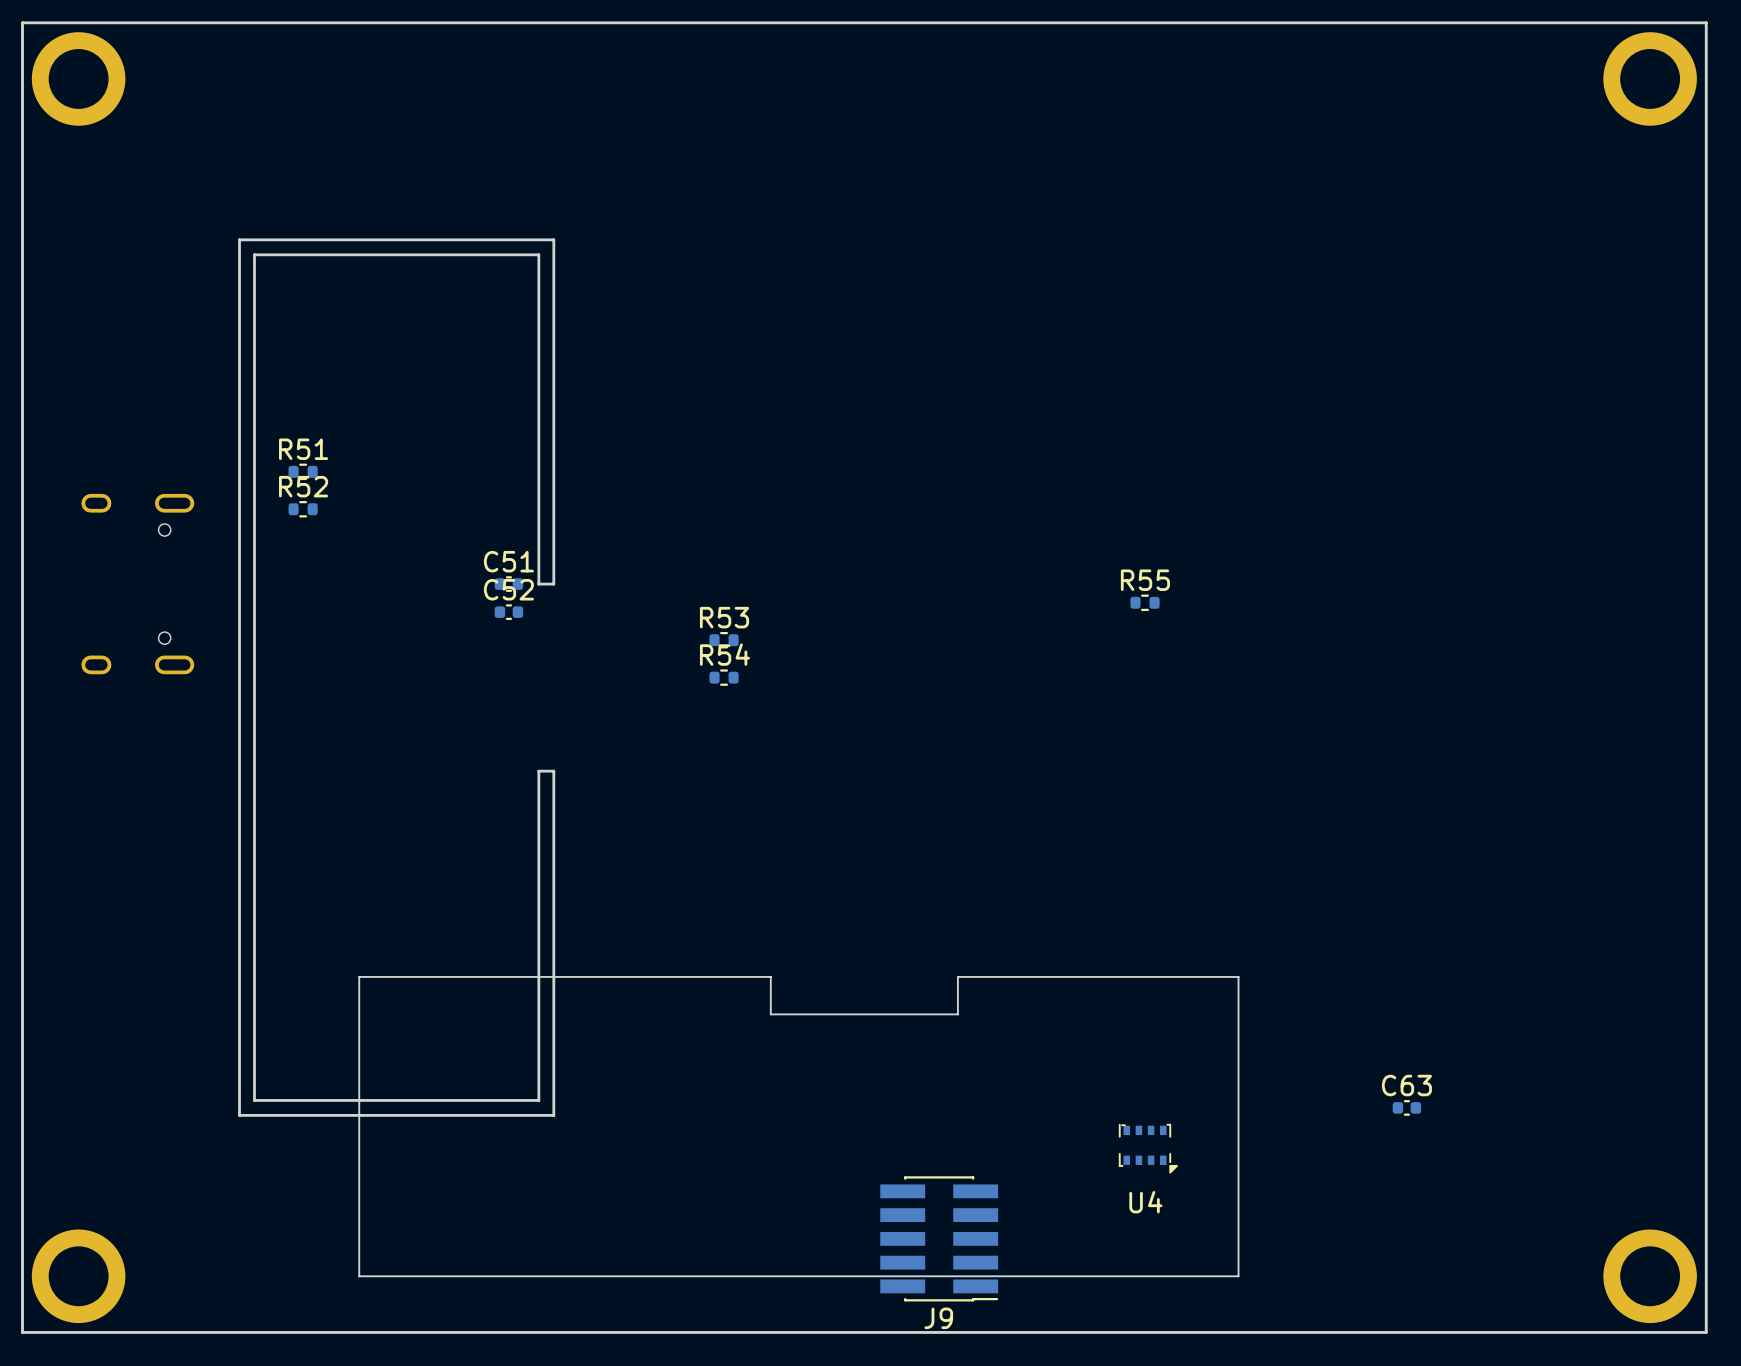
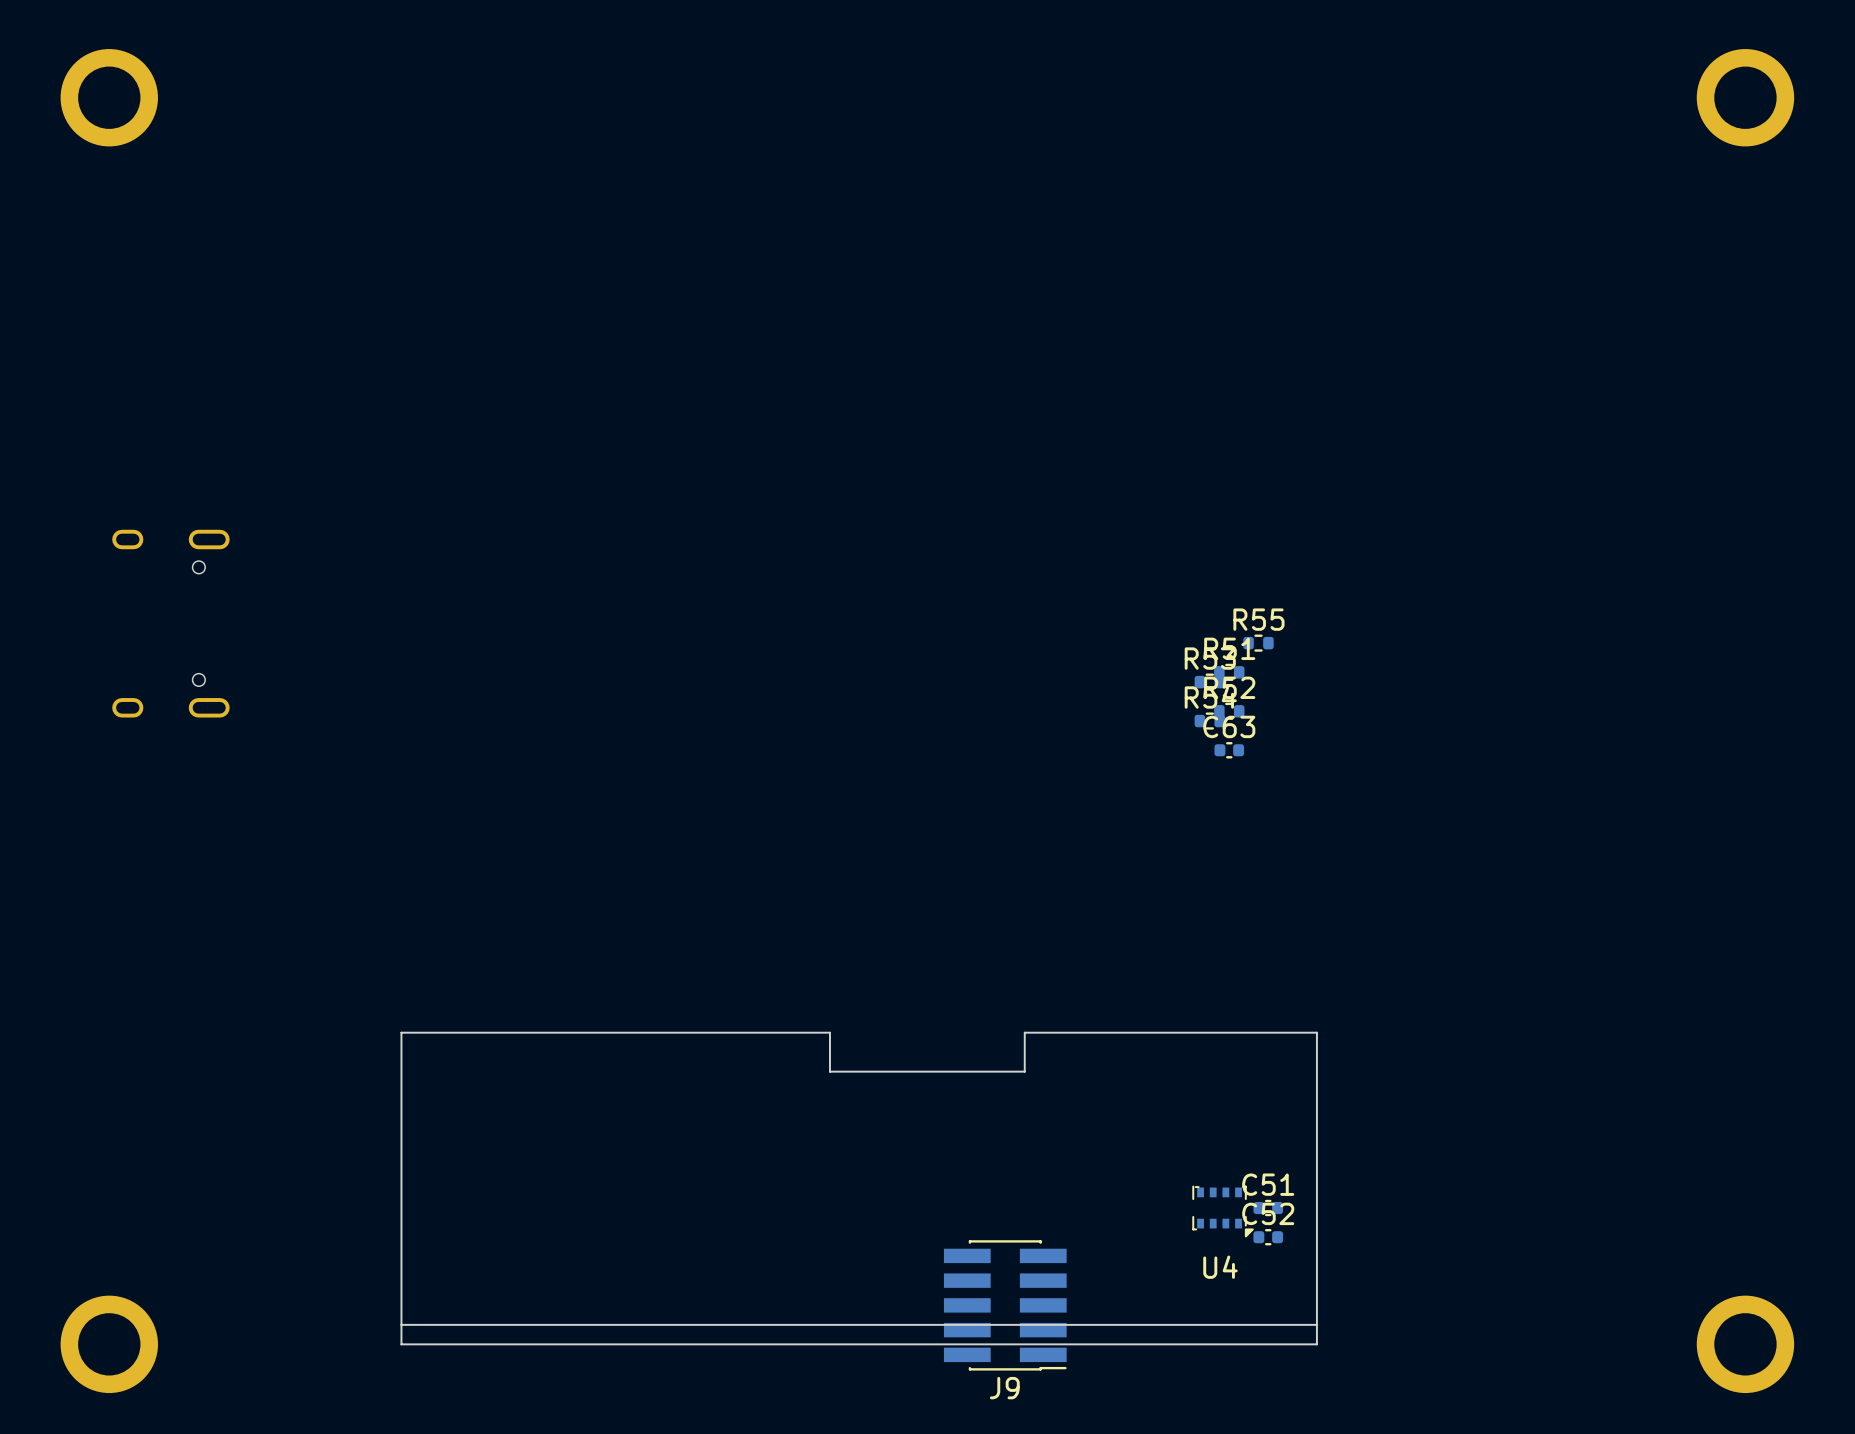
board edge: (22, 22) (22, 1332) -> none
board edge: (1706, 22) (22, 22) -> none
board edge: (1706, 22) (1706, 1332) -> none
board edge: (553, 239) (239, 239) (239, 1115) (553, 1115) (553, 771) (538, 771) (538, 1100) (254, 1100) (254, 254) (538, 254) (538, 584) (553, 584) (553, 239) -> none
R51 position: (303, 471) -> (1229, 672)
R52 position: (303, 509) -> (1229, 711)
C51 position: (508, 584) -> (1268, 1208)
R55 position: (1144, 602) -> (1258, 643)
C52 position: (508, 612) -> (1268, 1237)
R53 position: (724, 640) -> (1209, 682)
R54 position: (724, 677) -> (1209, 721)
C63 position: (1406, 1107) -> (1229, 750)
board edge: none -> (1316, 1324) (401, 1324)
board edge: (1706, 1332) (22, 1332) -> none

